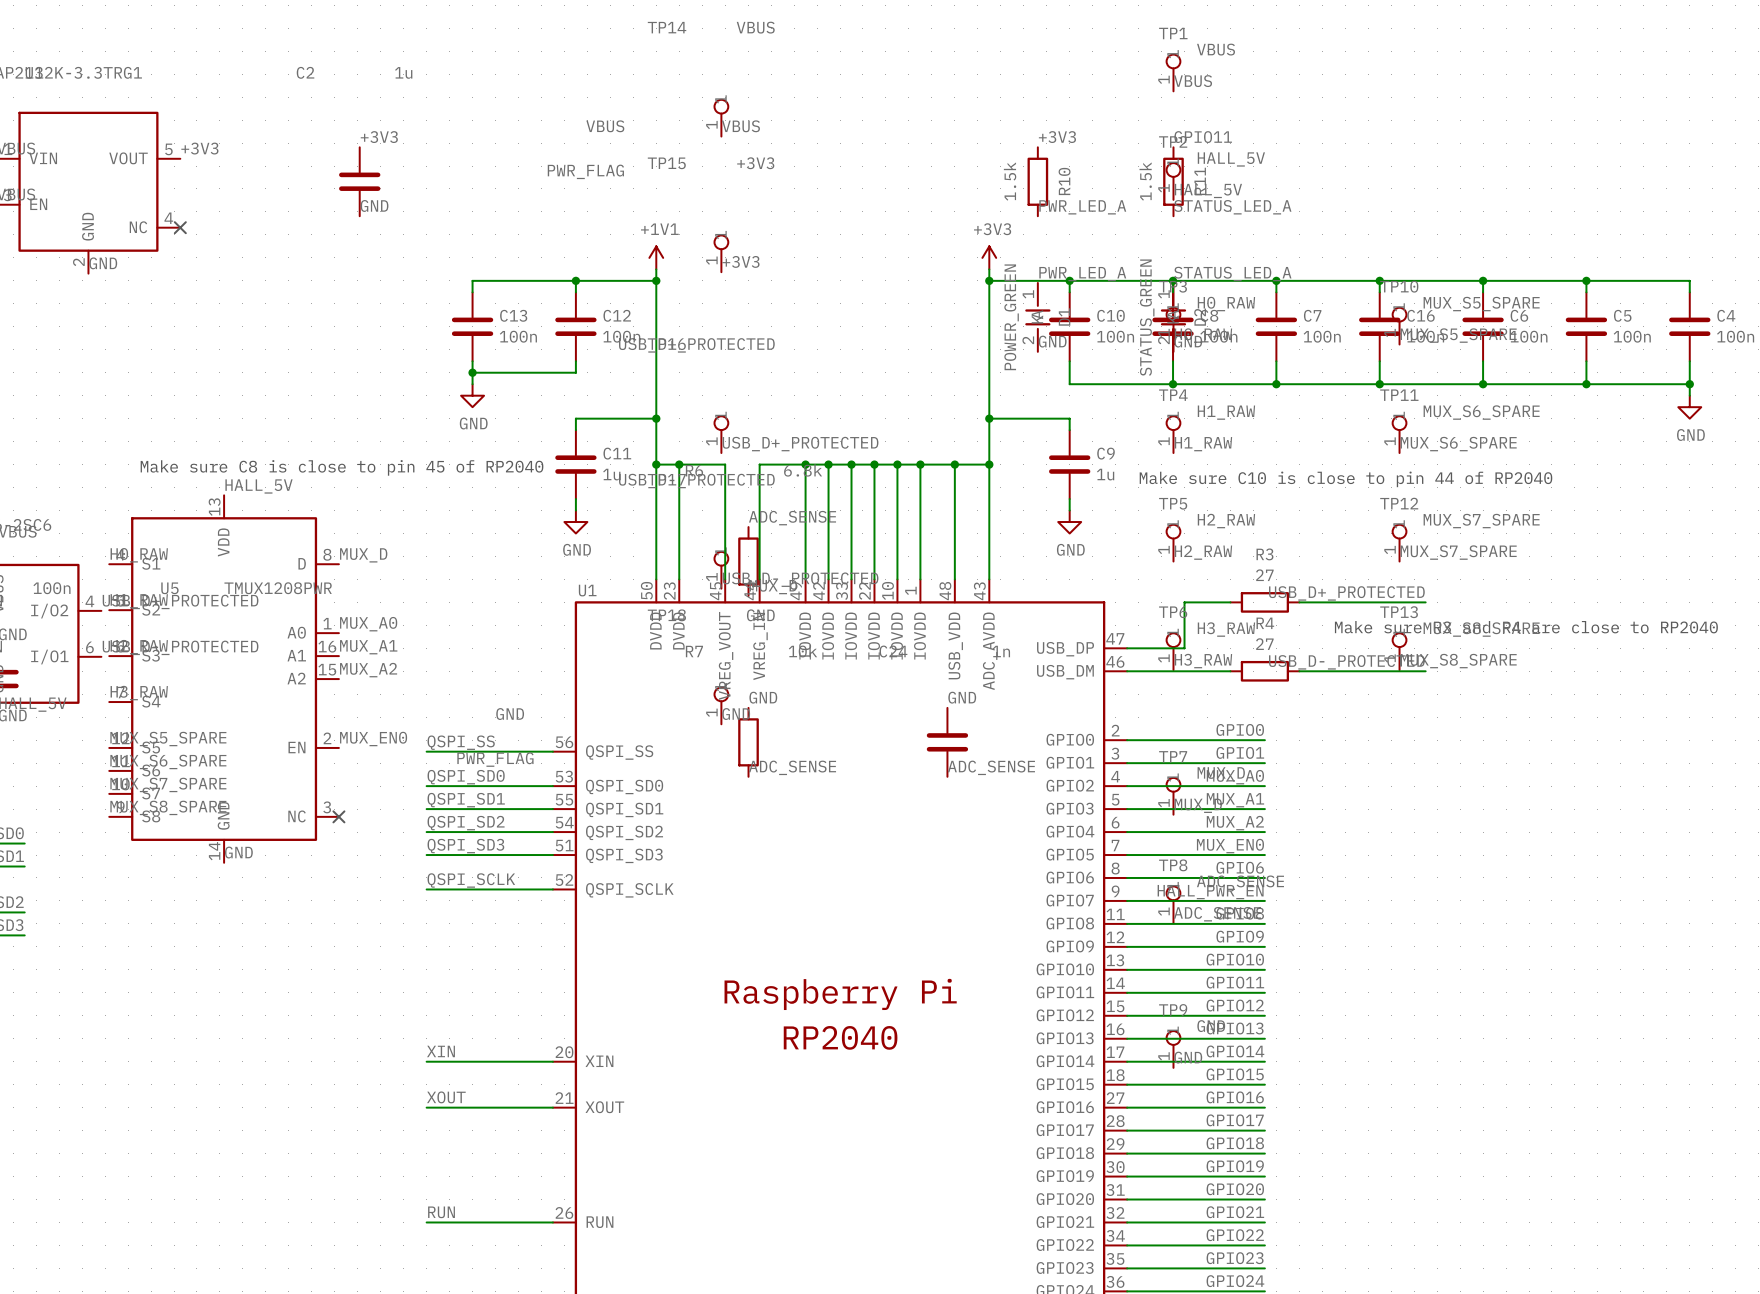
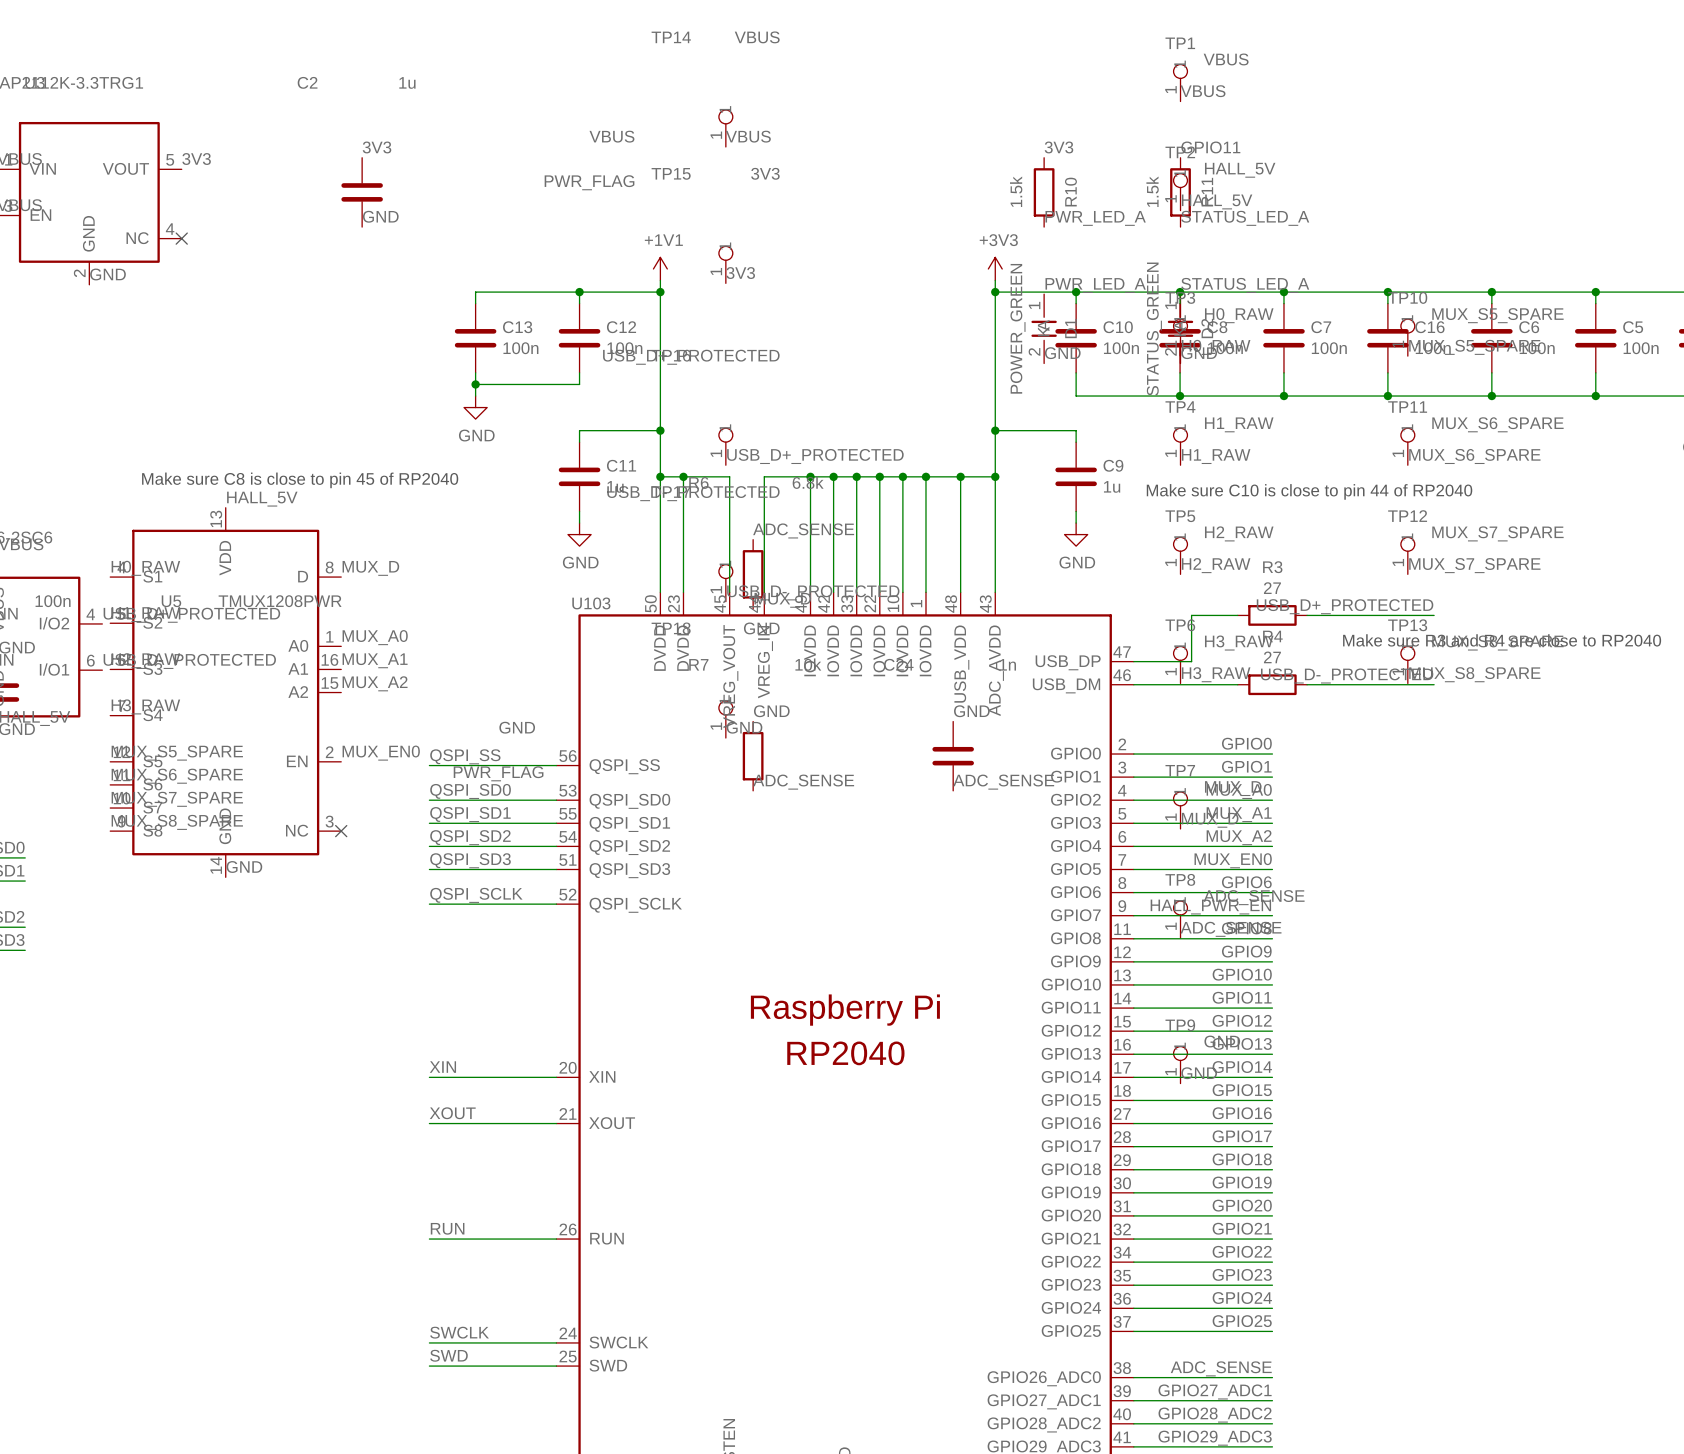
label: +3V3 (379, 137) -> 3V3 (377, 147)
label: +3V3 (1057, 137) -> 3V3 (1058, 147)
label: +3V3 (199, 148) -> 3V3 (196, 159)
TP15 value: +3V3 (755, 163) -> 3V3 (765, 173)
label: +3V3 (740, 261) -> 3V3 (740, 273)
U1 name: U1 (587, 590) -> U103 (591, 603)

